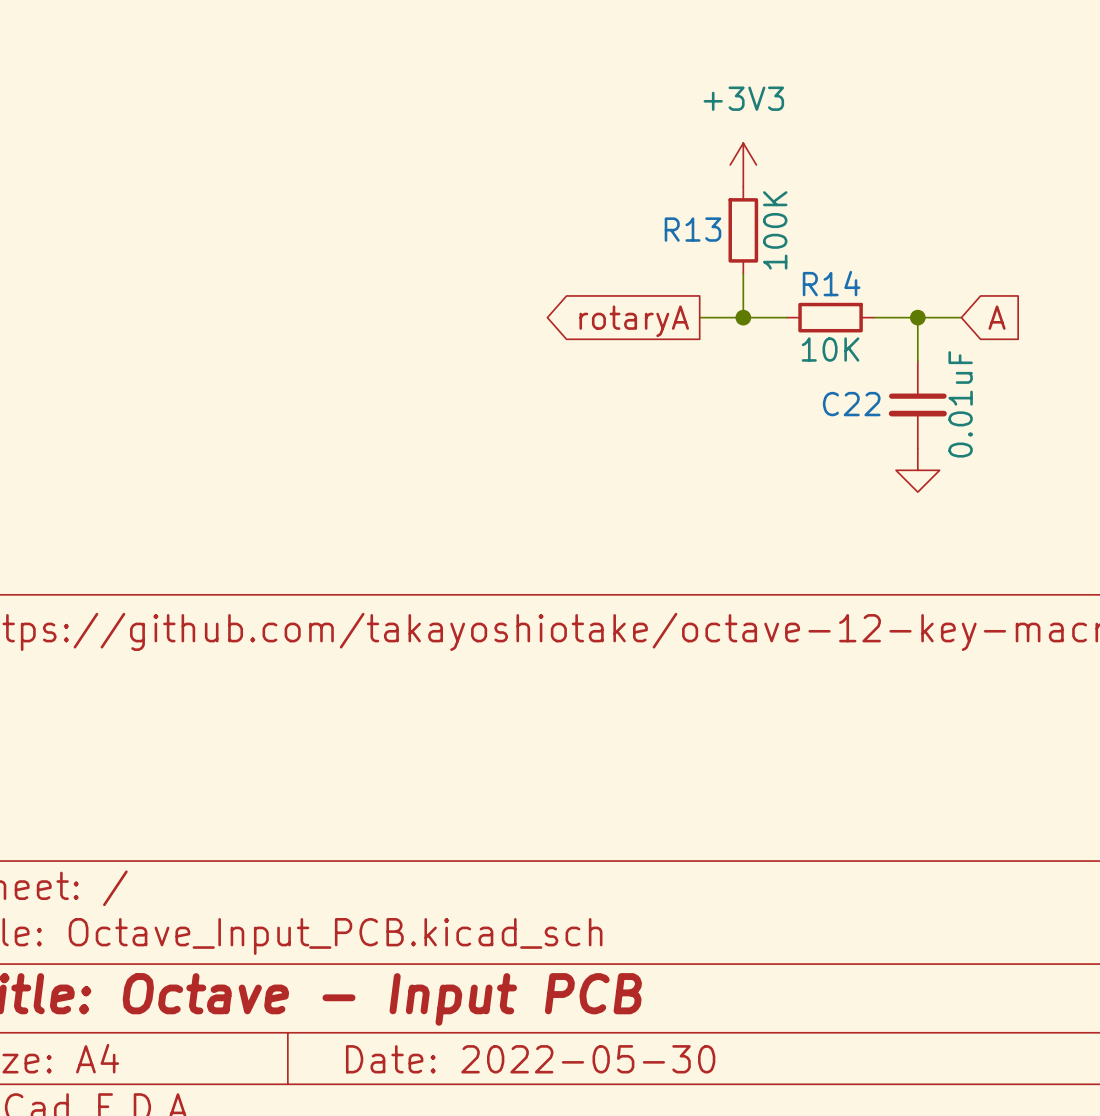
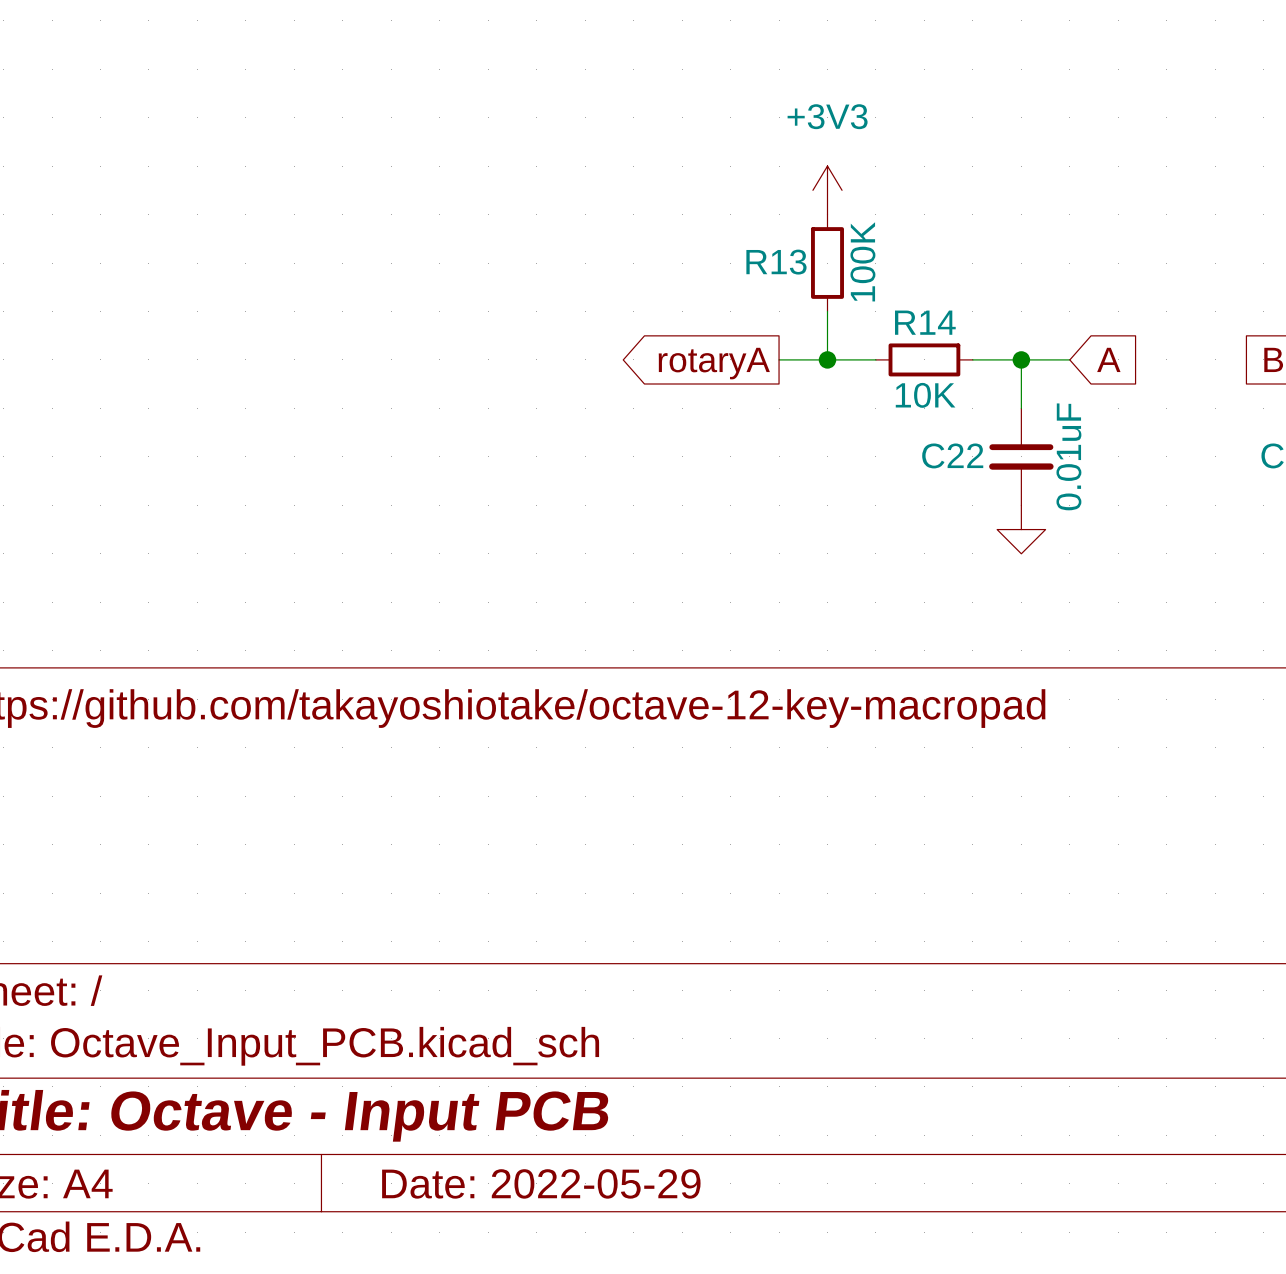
title block: Date: 2022-05-30 (530, 1059) -> Date: 2022-05-29 (541, 1183)

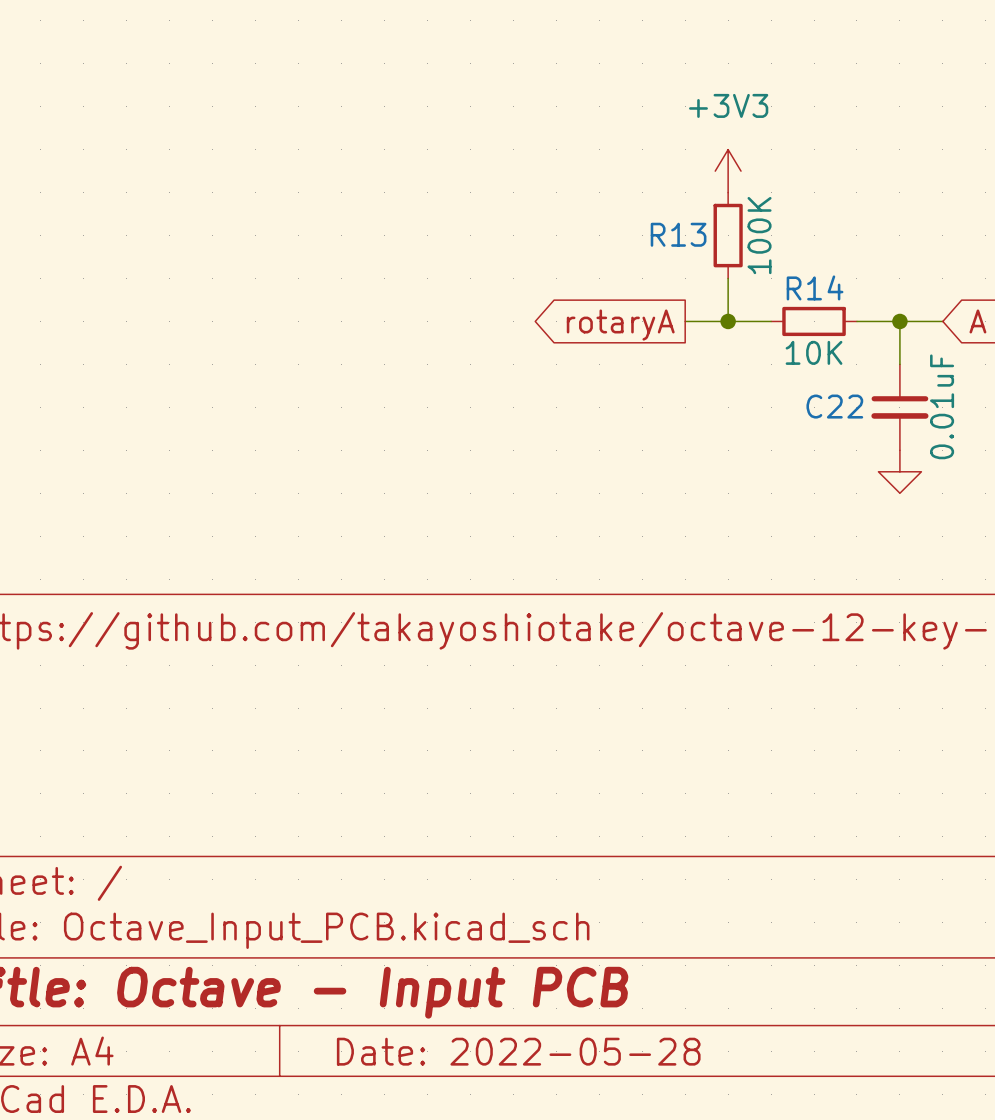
title block: Date: 2022-05-29 (541, 1183) -> Date: 2022-05-28 (518, 1051)

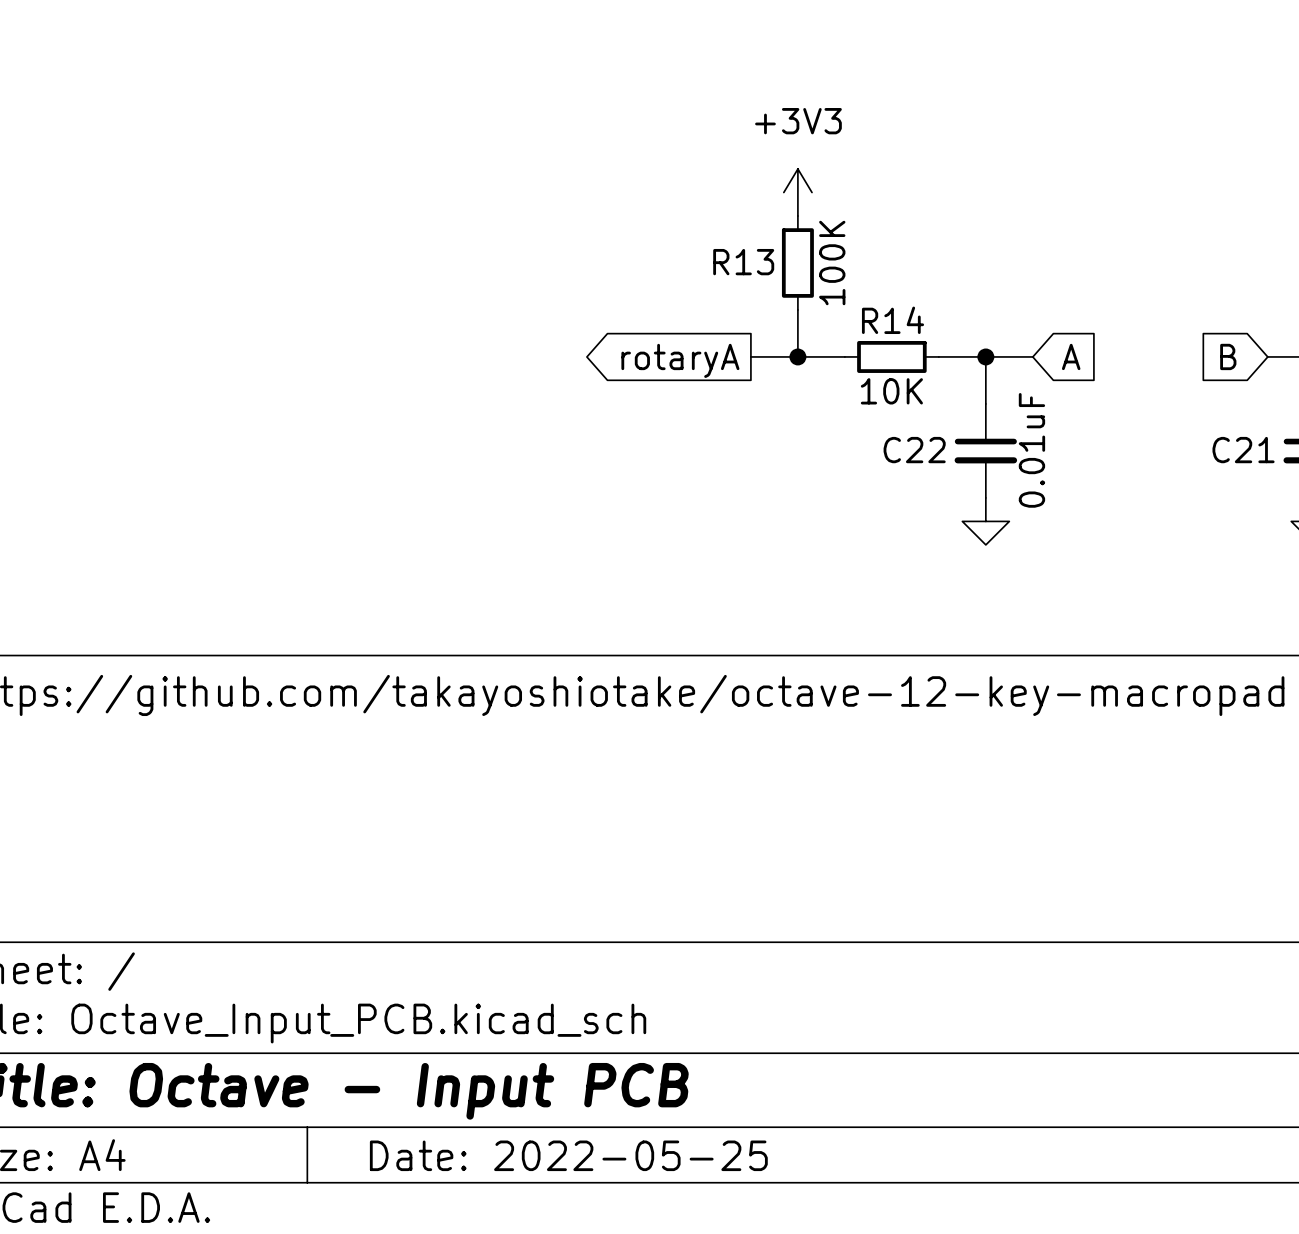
title block: Date: 2022-05-28 (518, 1051) -> Date: 2022-05-25 (568, 1155)

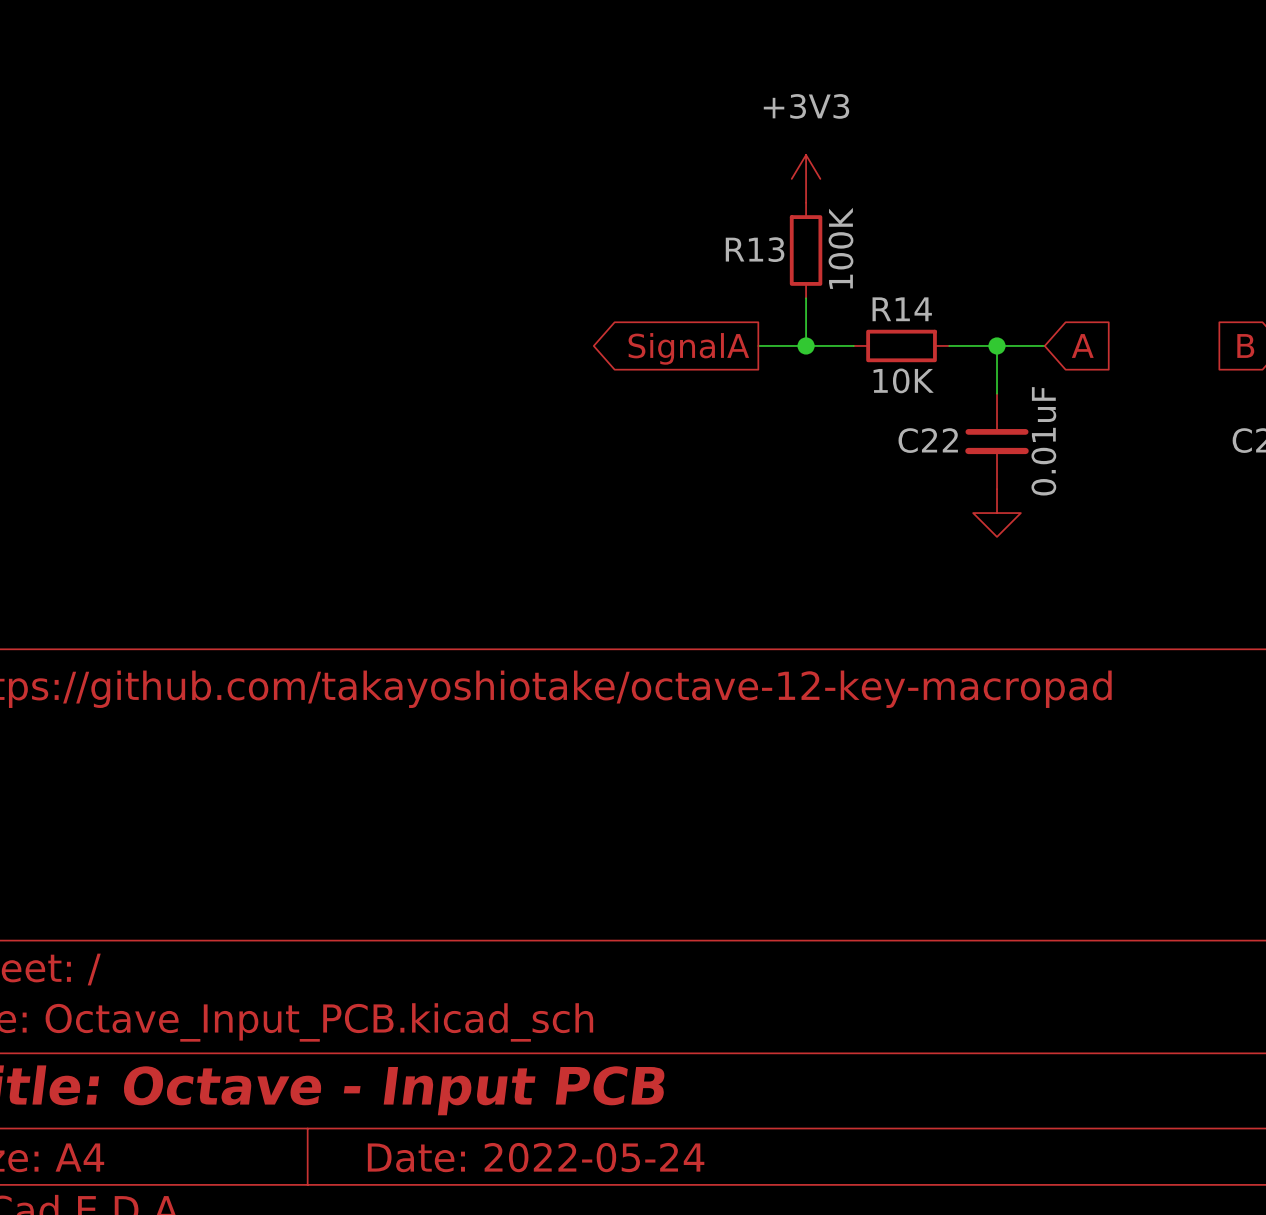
global label: rotaryA (680, 360) -> SignalA (688, 348)
title block: Date: 2022-05-25 (568, 1155) -> Date: 2022-05-24 (536, 1157)

